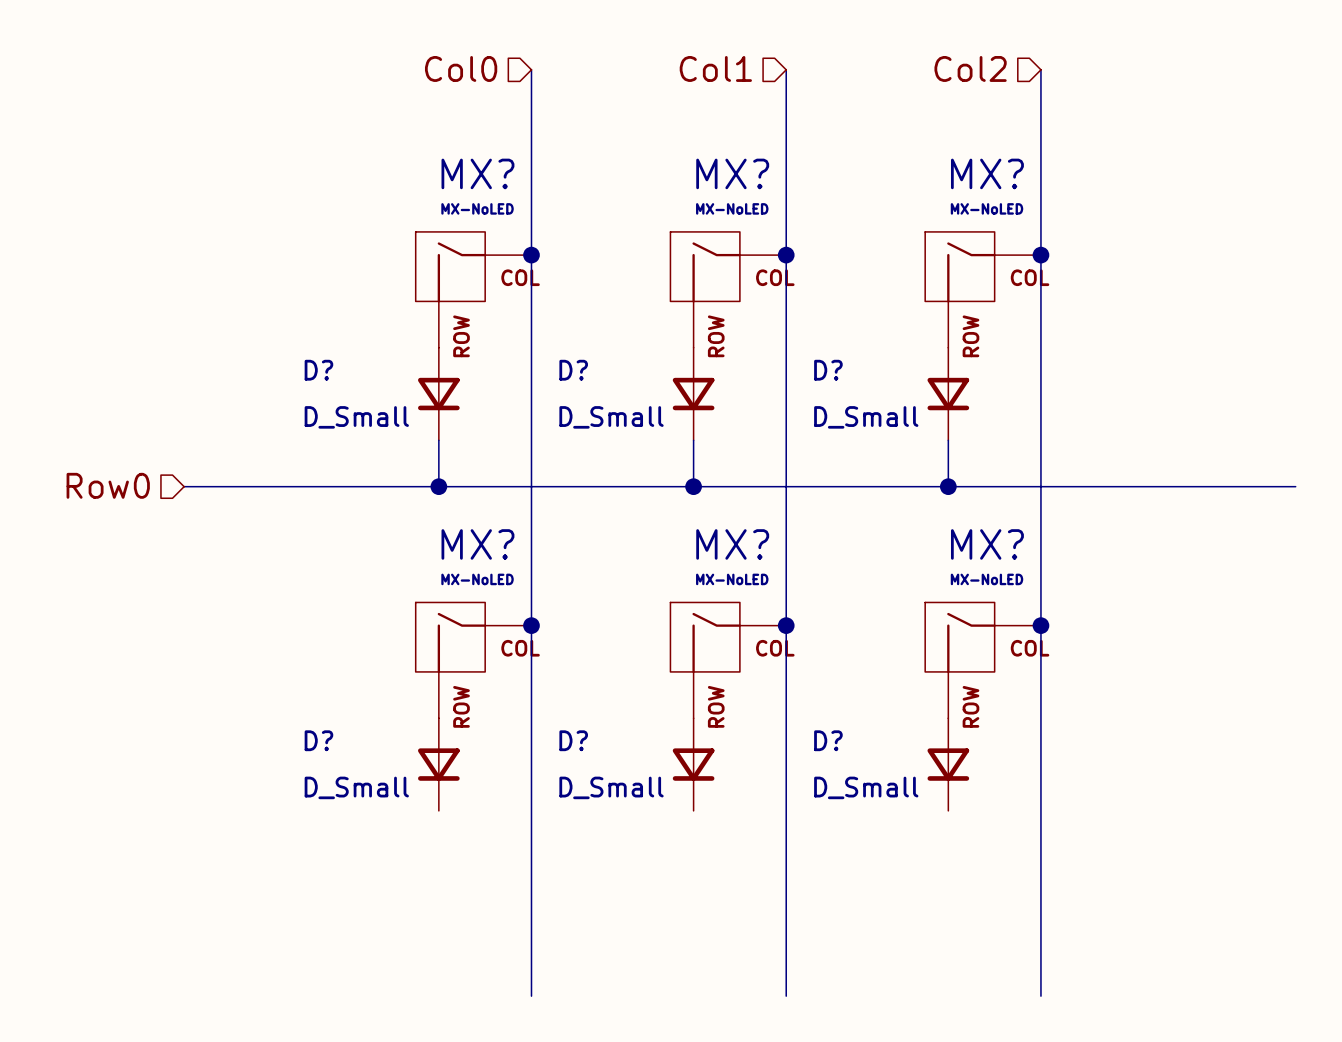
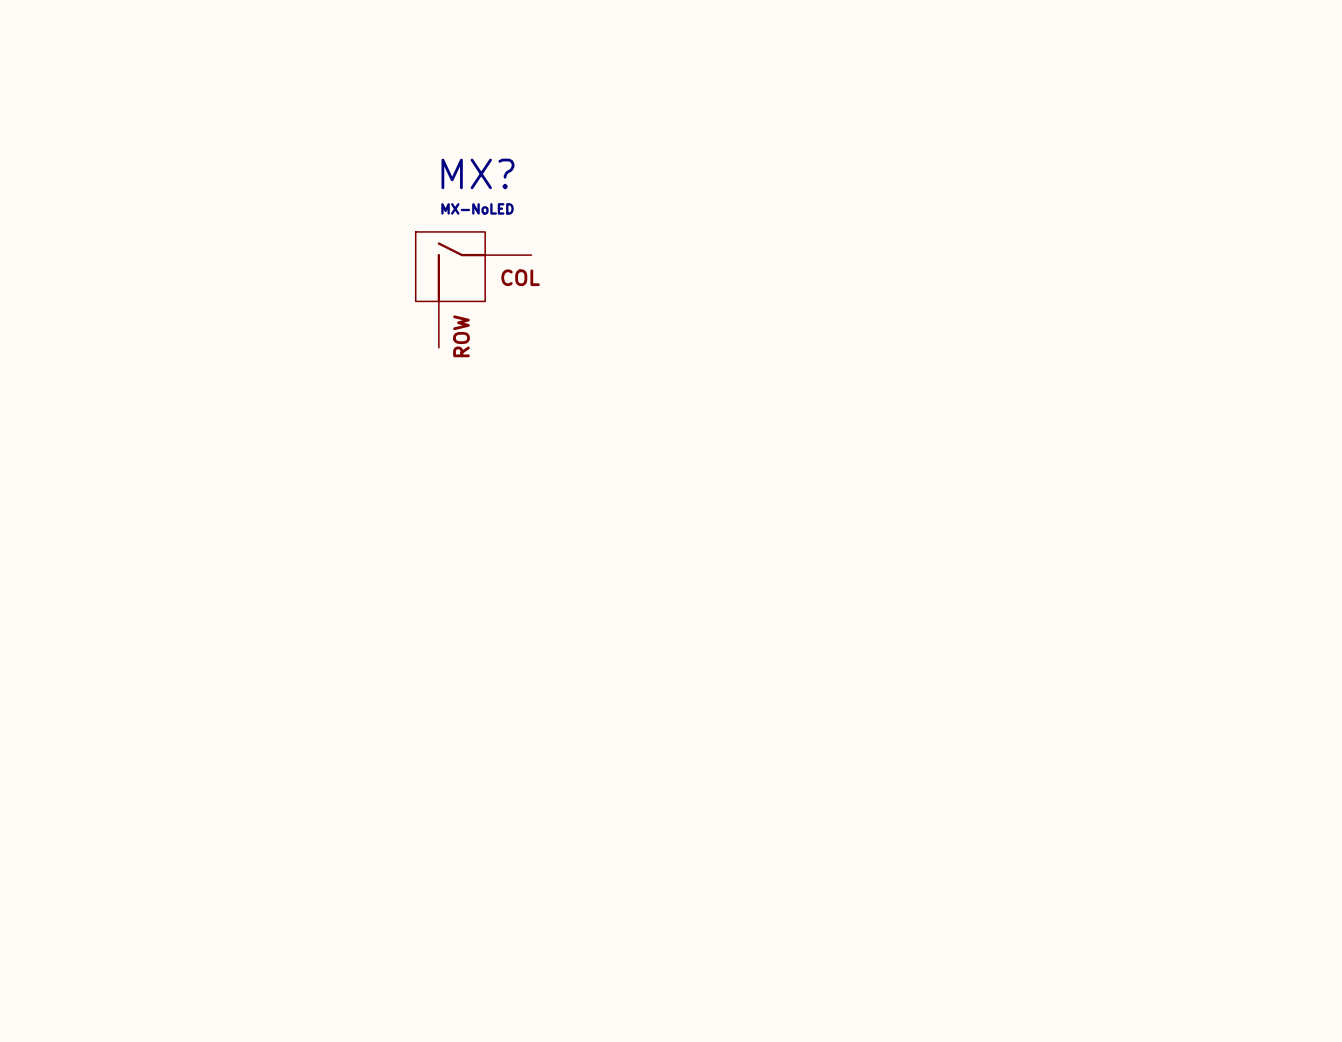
hierarchical label: Col0 (461, 68) -> none
hierarchical label: Col1 (715, 68) -> none
hierarchical label: Col2 (970, 68) -> none
wire: (531, 69) (531, 996) -> none
wire: (786, 69) (786, 996) -> none
wire: (1040, 69) (1040, 996) -> none
junction: (531, 255) -> none
junction: (786, 255) -> none
junction: (1040, 255) -> none
MX?: MX-NoLED (728, 289) -> none
MX?: MX-NoLED (983, 289) -> none
D?: D_Small (438, 394) -> none
D?: D_Small (693, 394) -> none
D?: D_Small (948, 394) -> none
wire: (438, 440) (438, 486) -> none
wire: (693, 440) (693, 486) -> none
wire: (948, 440) (948, 486) -> none
hierarchical label: Row0 (108, 485) -> none
wire: (184, 486) (1295, 486) -> none
junction: (438, 486) -> none
junction: (693, 486) -> none
junction: (948, 486) -> none
junction: (531, 625) -> none
junction: (786, 625) -> none
junction: (1040, 625) -> none
MX?: MX-NoLED (473, 660) -> none
MX?: MX-NoLED (728, 660) -> none
MX?: MX-NoLED (983, 660) -> none
D?: D_Small (438, 764) -> none
D?: D_Small (693, 764) -> none
D?: D_Small (948, 764) -> none

